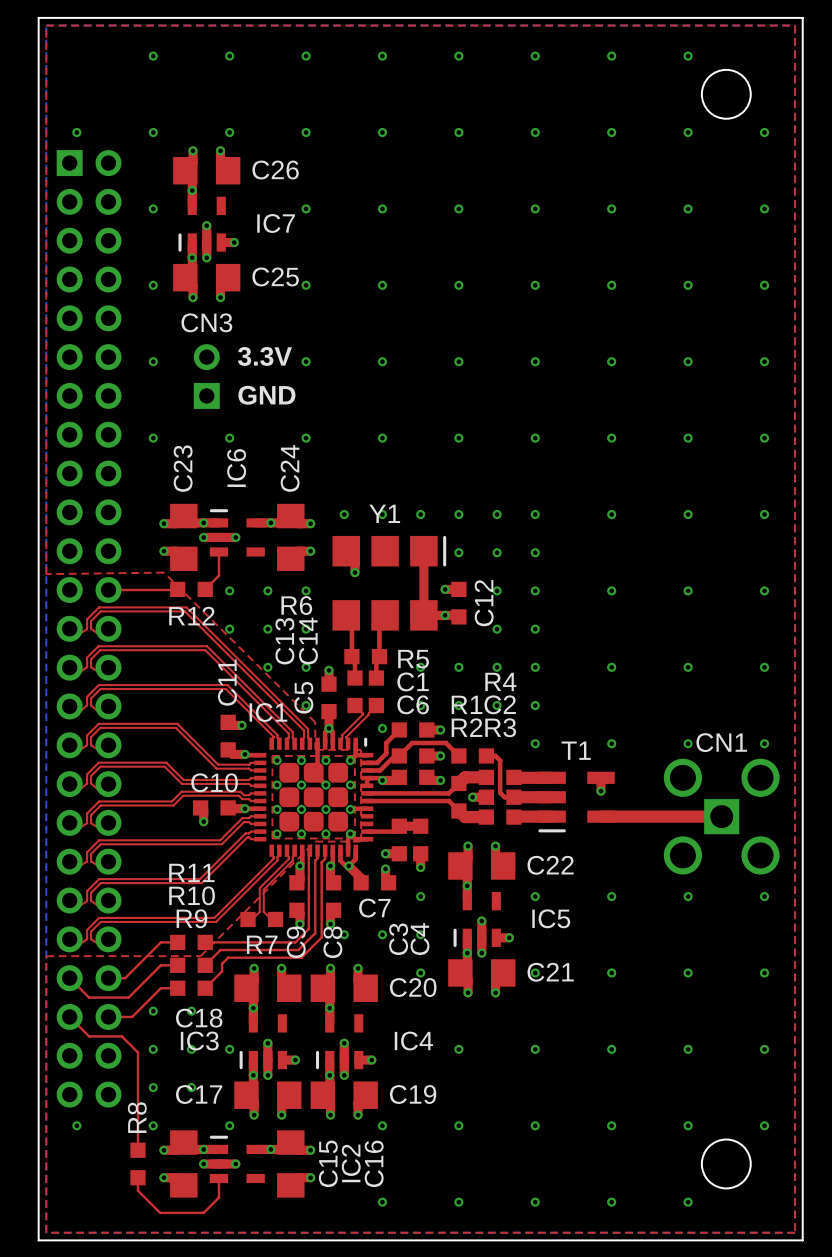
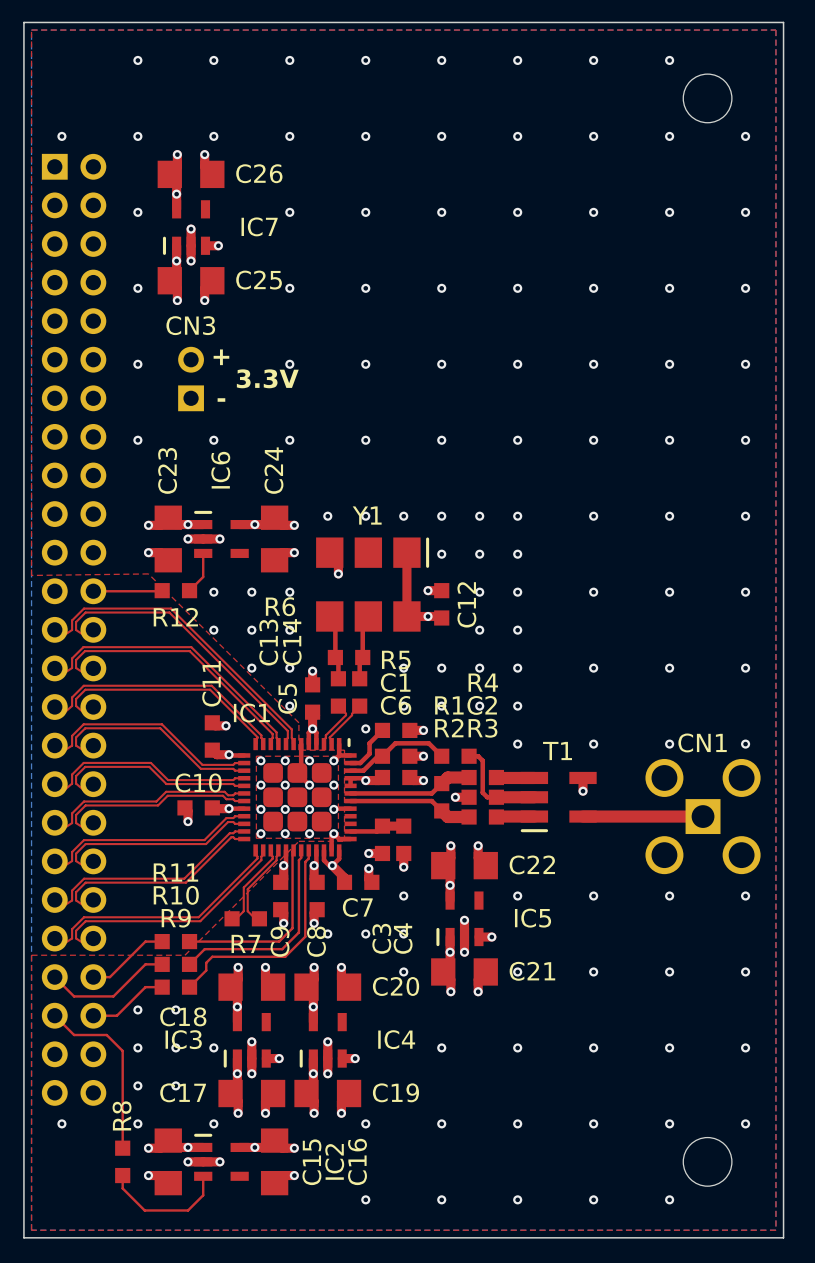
text: 3.3V (264, 356) -> + (221, 357)
text: none -> 3.3V (267, 378)
text: GND (266, 395) -> - (221, 400)

